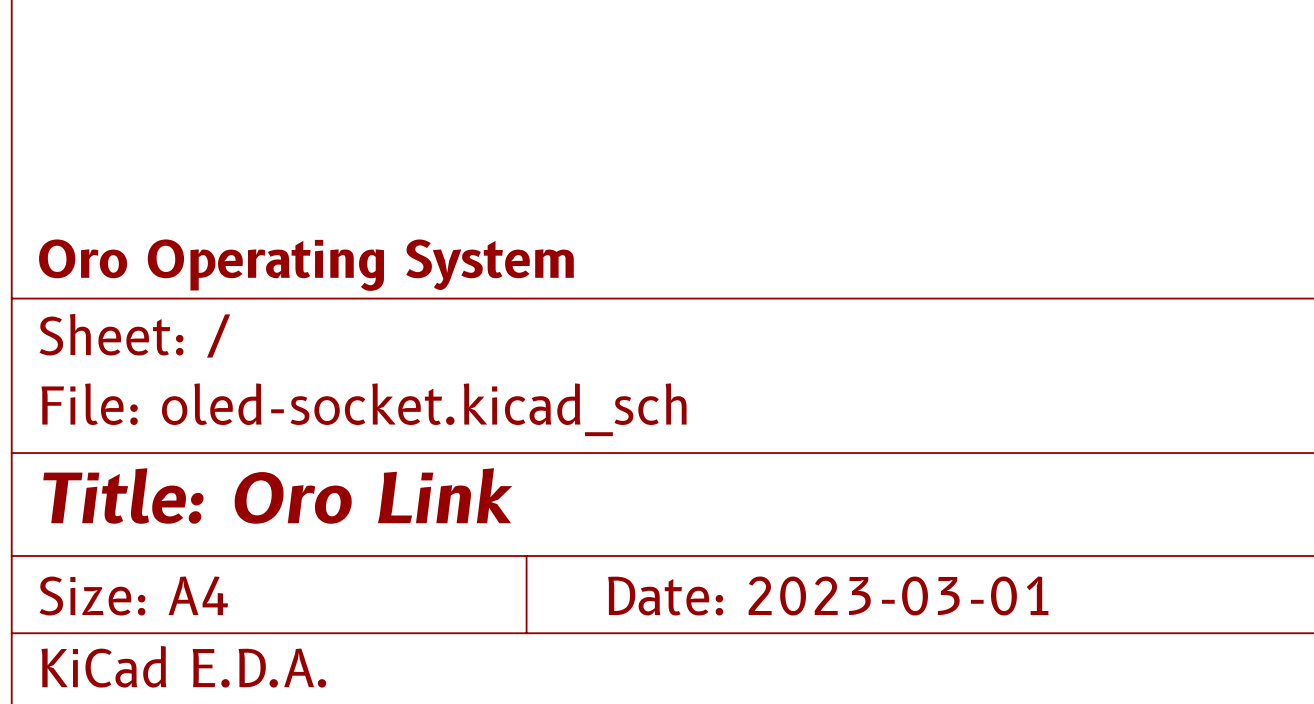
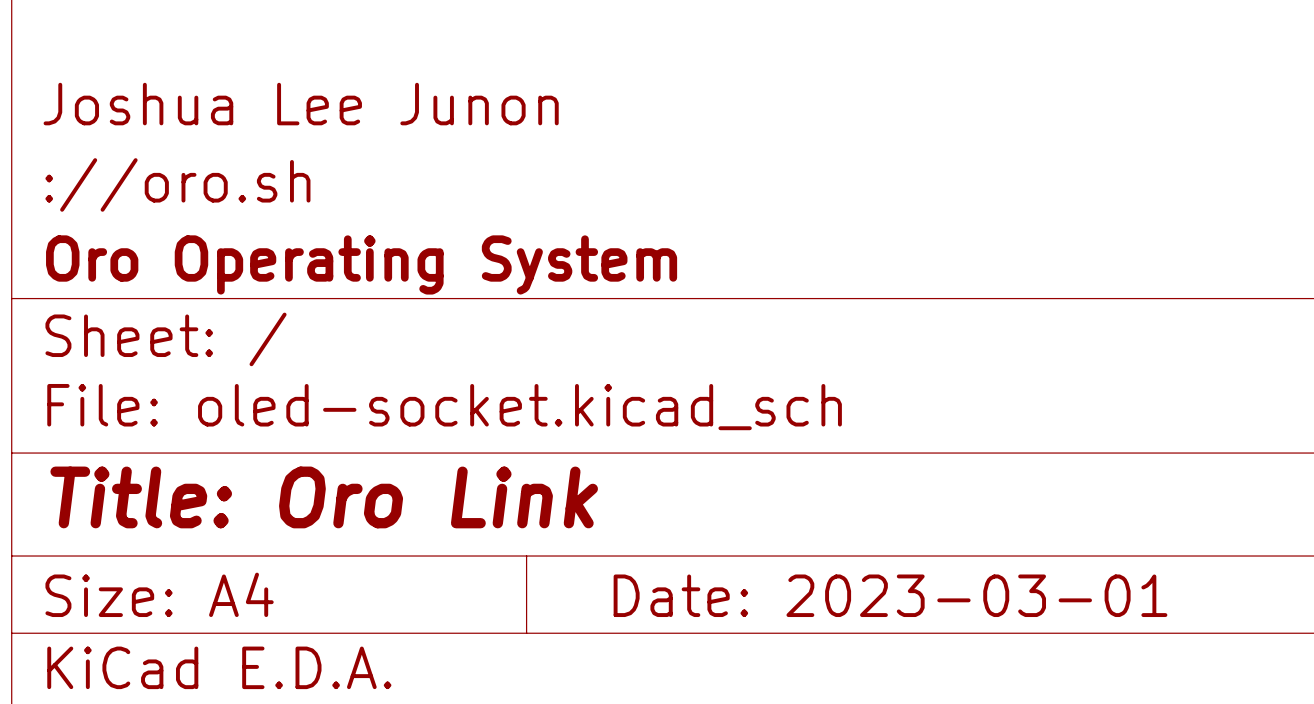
title block: none -> Joshua Lee Junon (301, 104)
title block: none -> ://oro.sh (177, 184)

